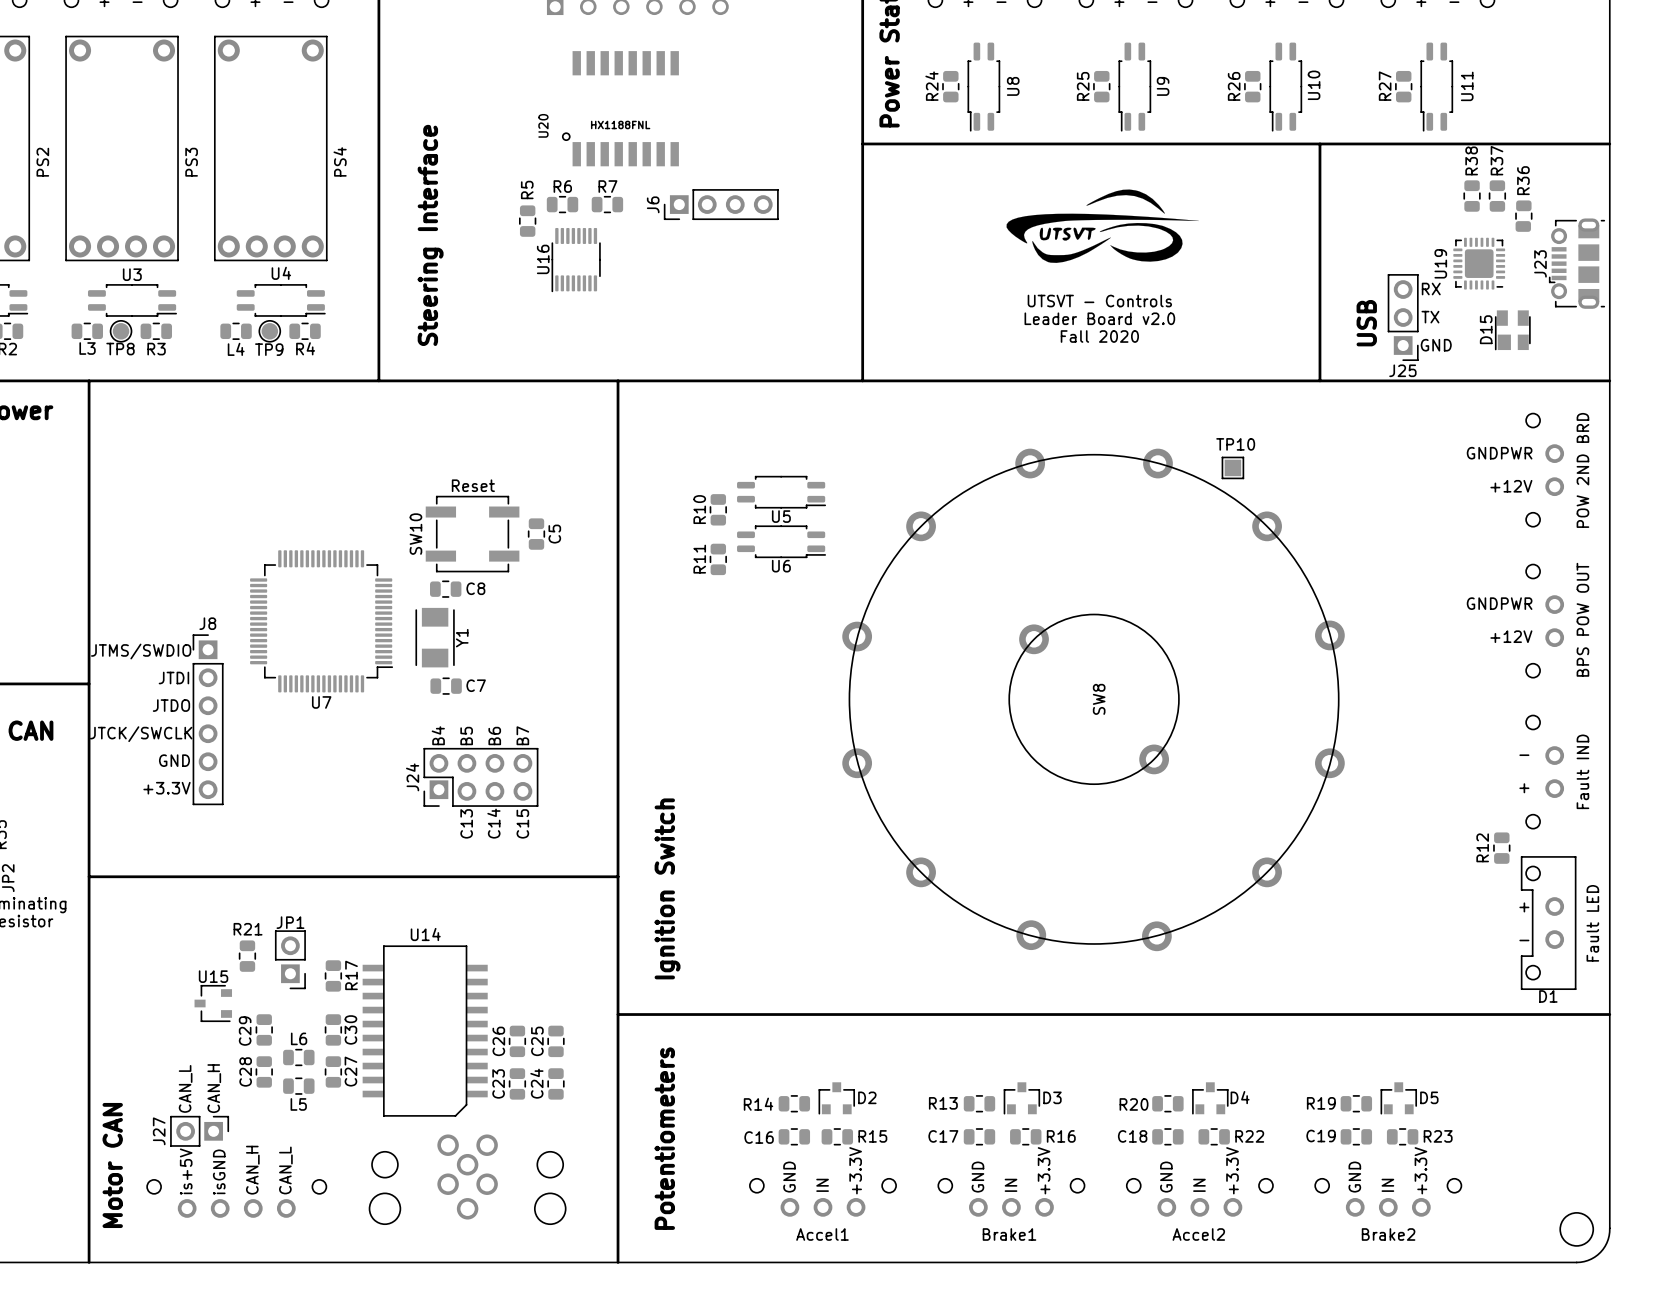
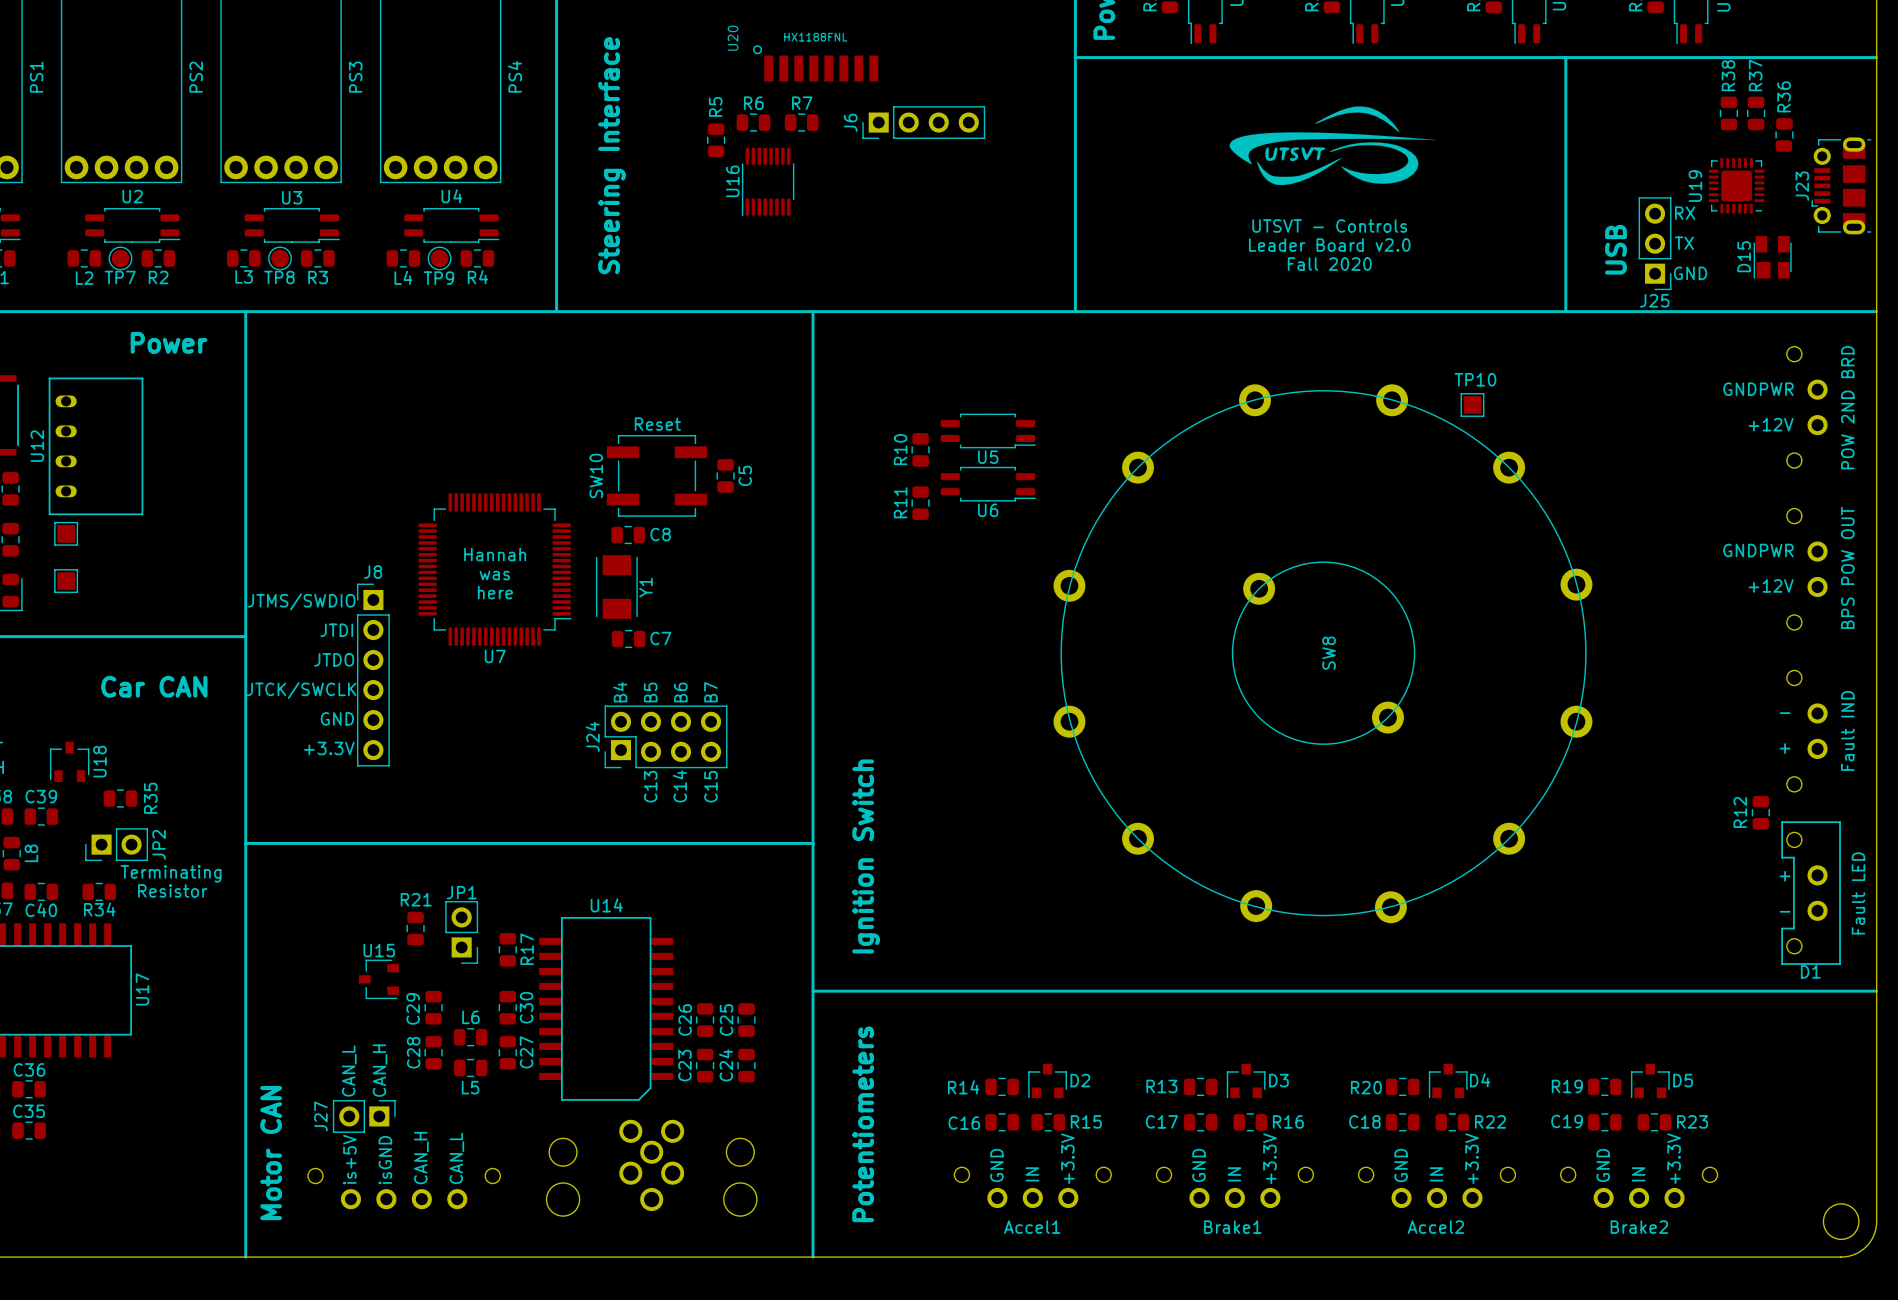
text: none -> Hannah (495, 554)
text: none -> was (494, 575)
text: none -> here (495, 592)

